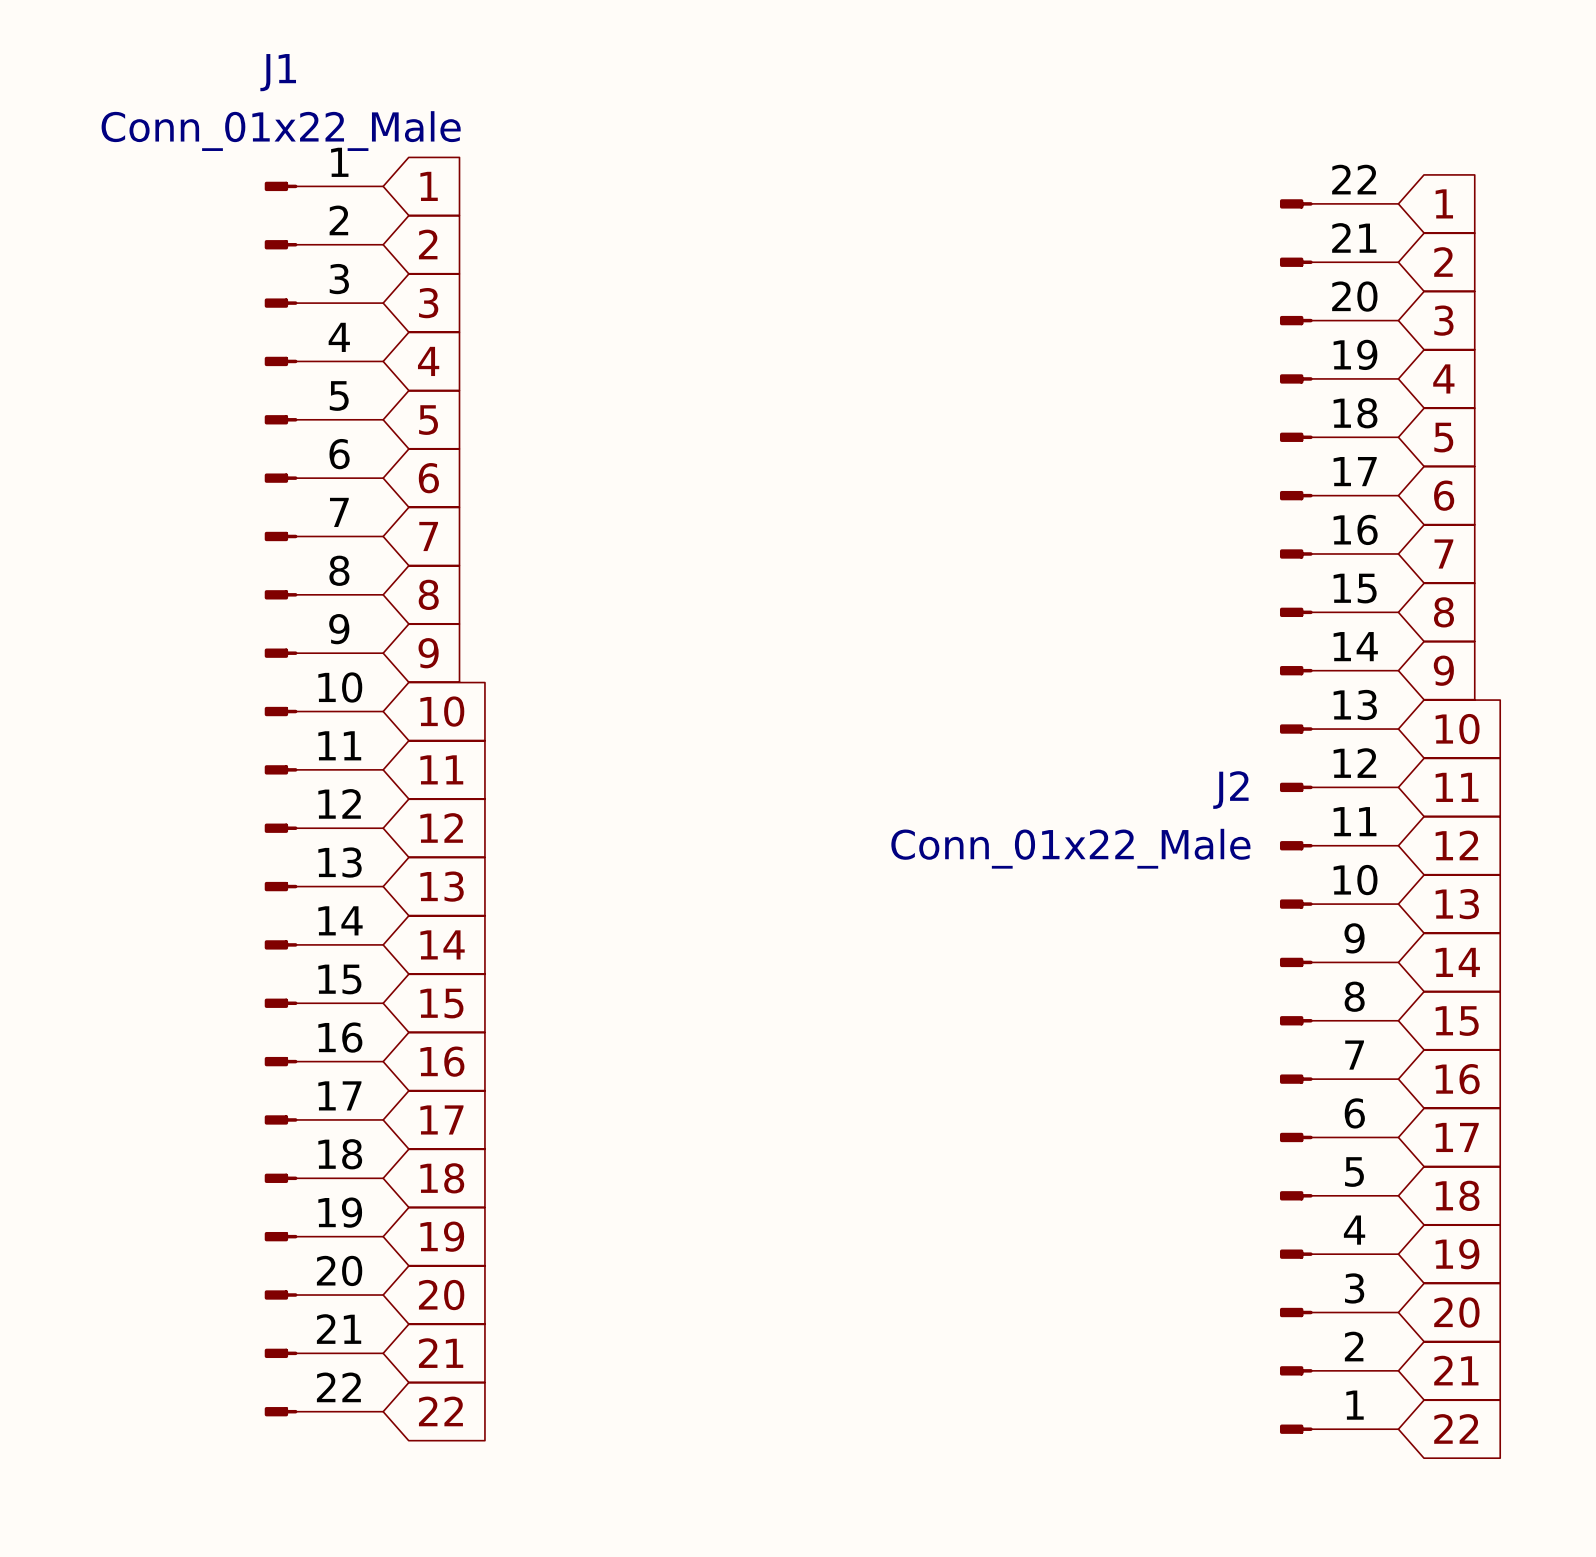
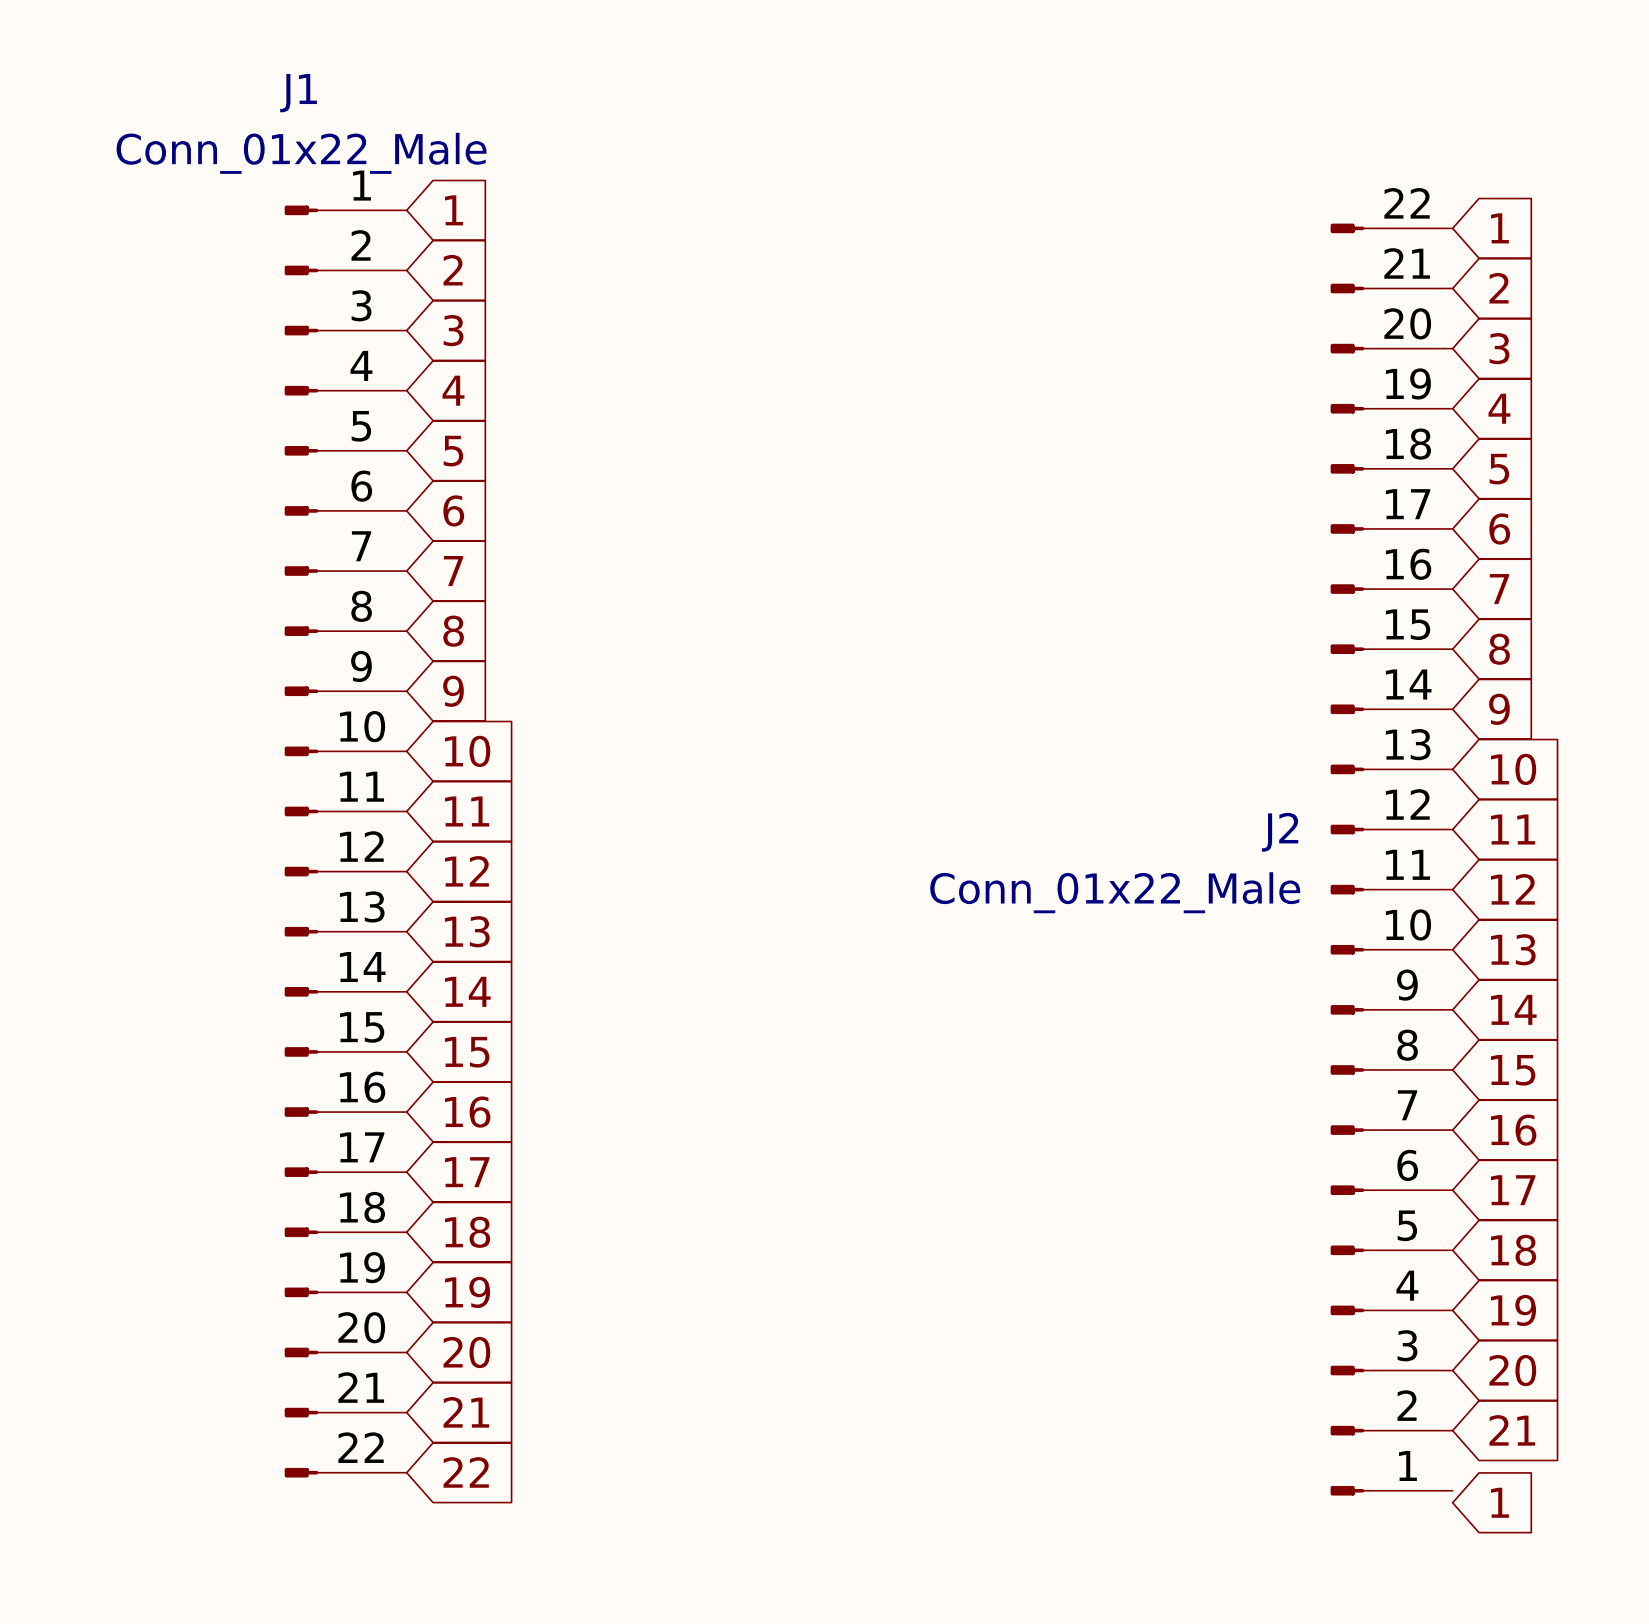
global label: 22 (1456, 1428) -> 1 (1499, 1502)

